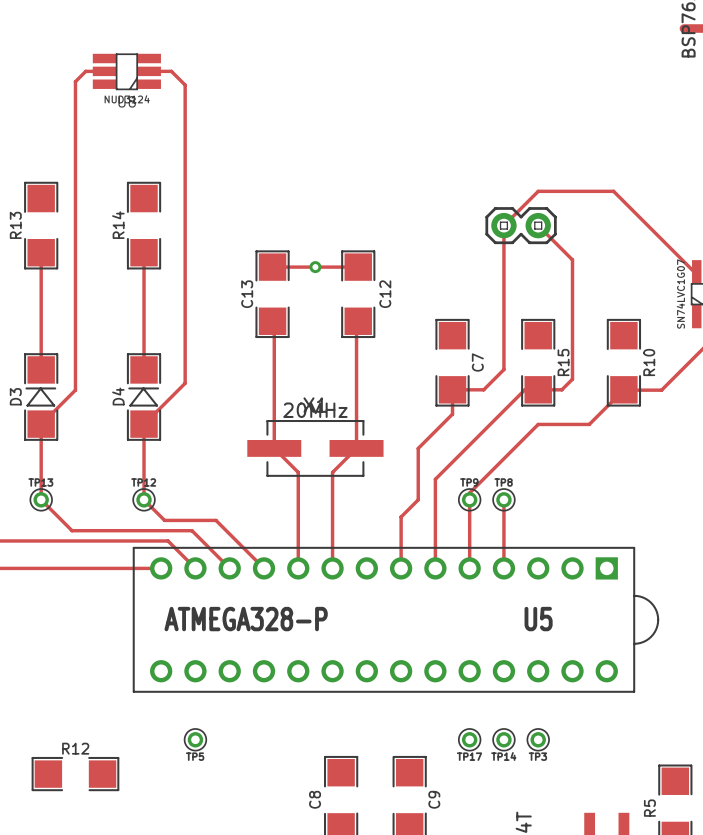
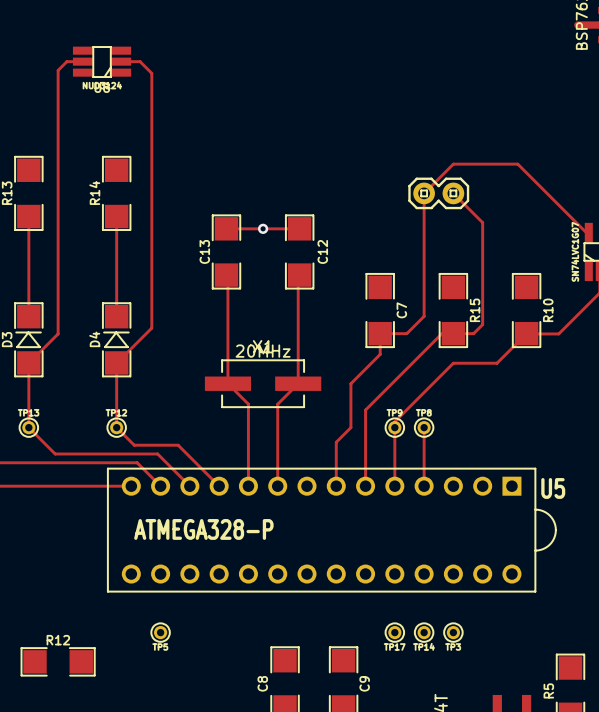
U5 name position: U5 (538, 619) -> U5 (553, 488)

